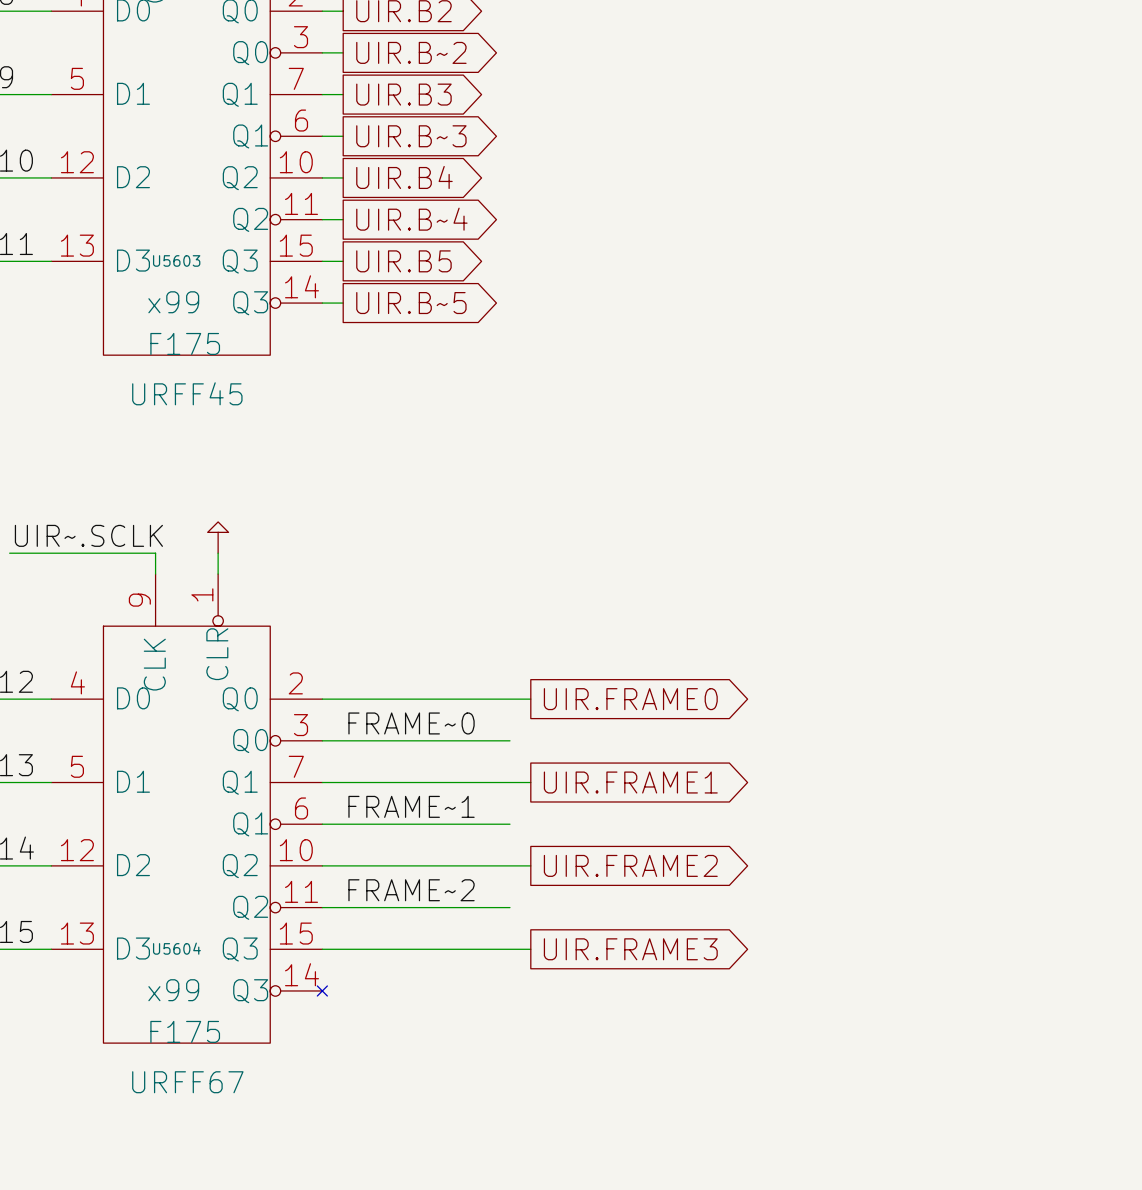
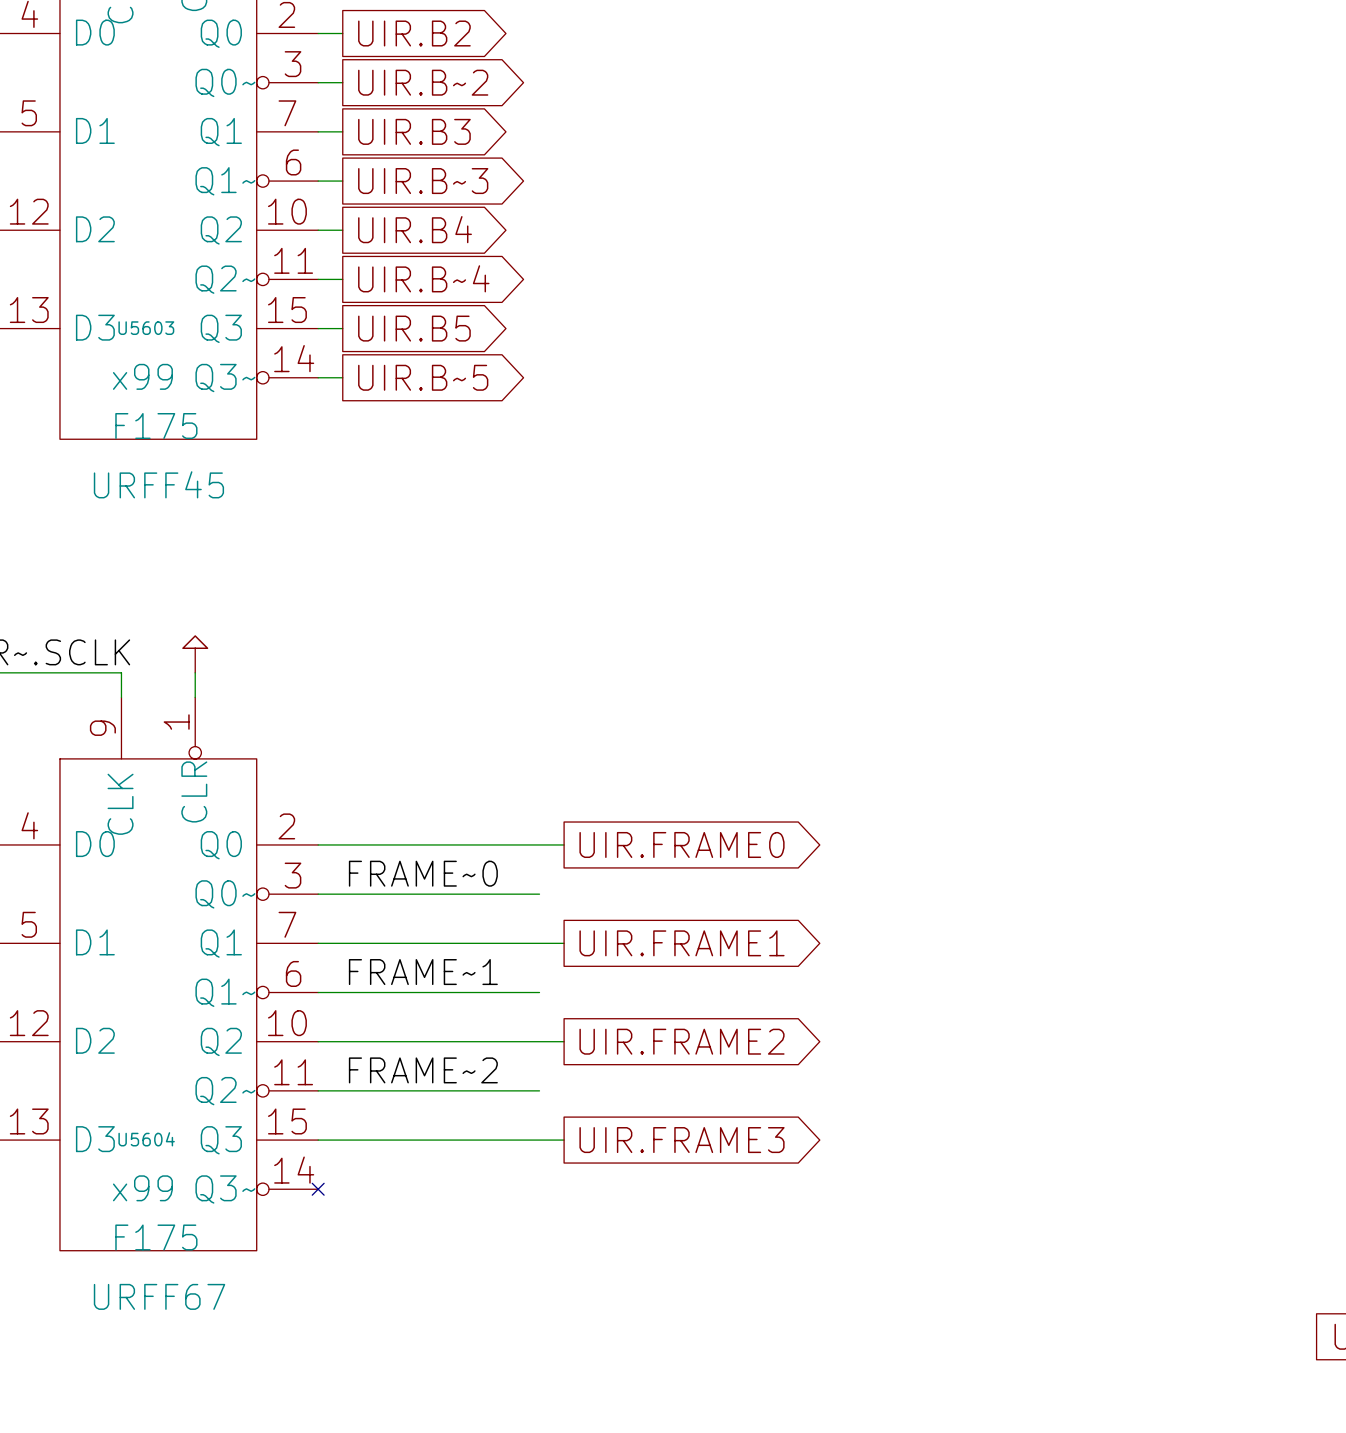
U5603 pin name: Q0 (250, 53) -> Q0~ (225, 82)
U5603 pin name: Q1 (250, 136) -> Q1~ (225, 181)
U5603 pin name: Q2 (250, 219) -> Q2~ (225, 279)
U5603 pin name: Q3 (250, 303) -> Q3~ (225, 378)
U5604 pin name: Q0 (250, 741) -> Q0~ (225, 894)
U5604 pin name: Q1 (250, 824) -> Q1~ (225, 992)
U5604 pin name: Q2 (250, 907) -> Q2~ (225, 1091)
U5604 pin name: Q3 (250, 991) -> Q3~ (225, 1189)

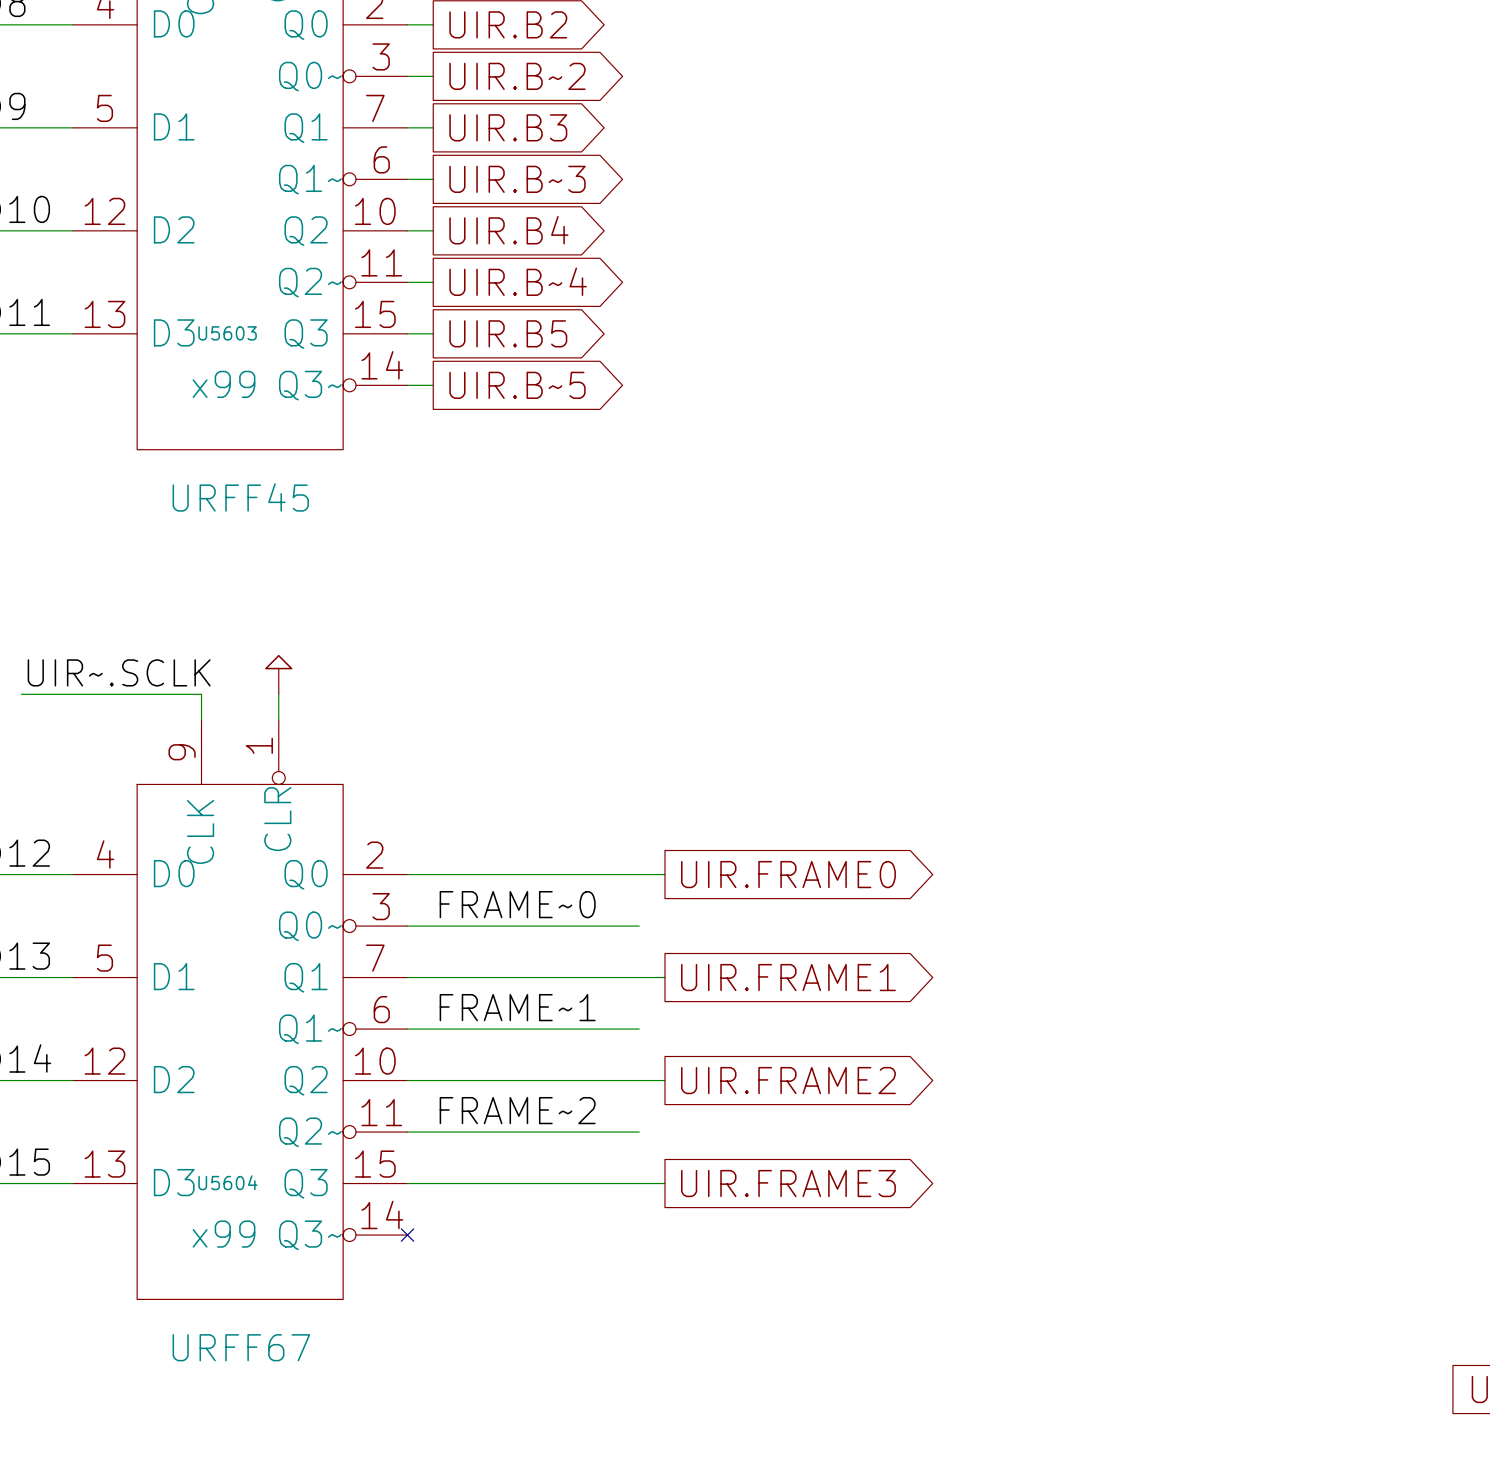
U5603 value: F175 (156, 426) -> none
U5604 value: F175 (156, 1237) -> none

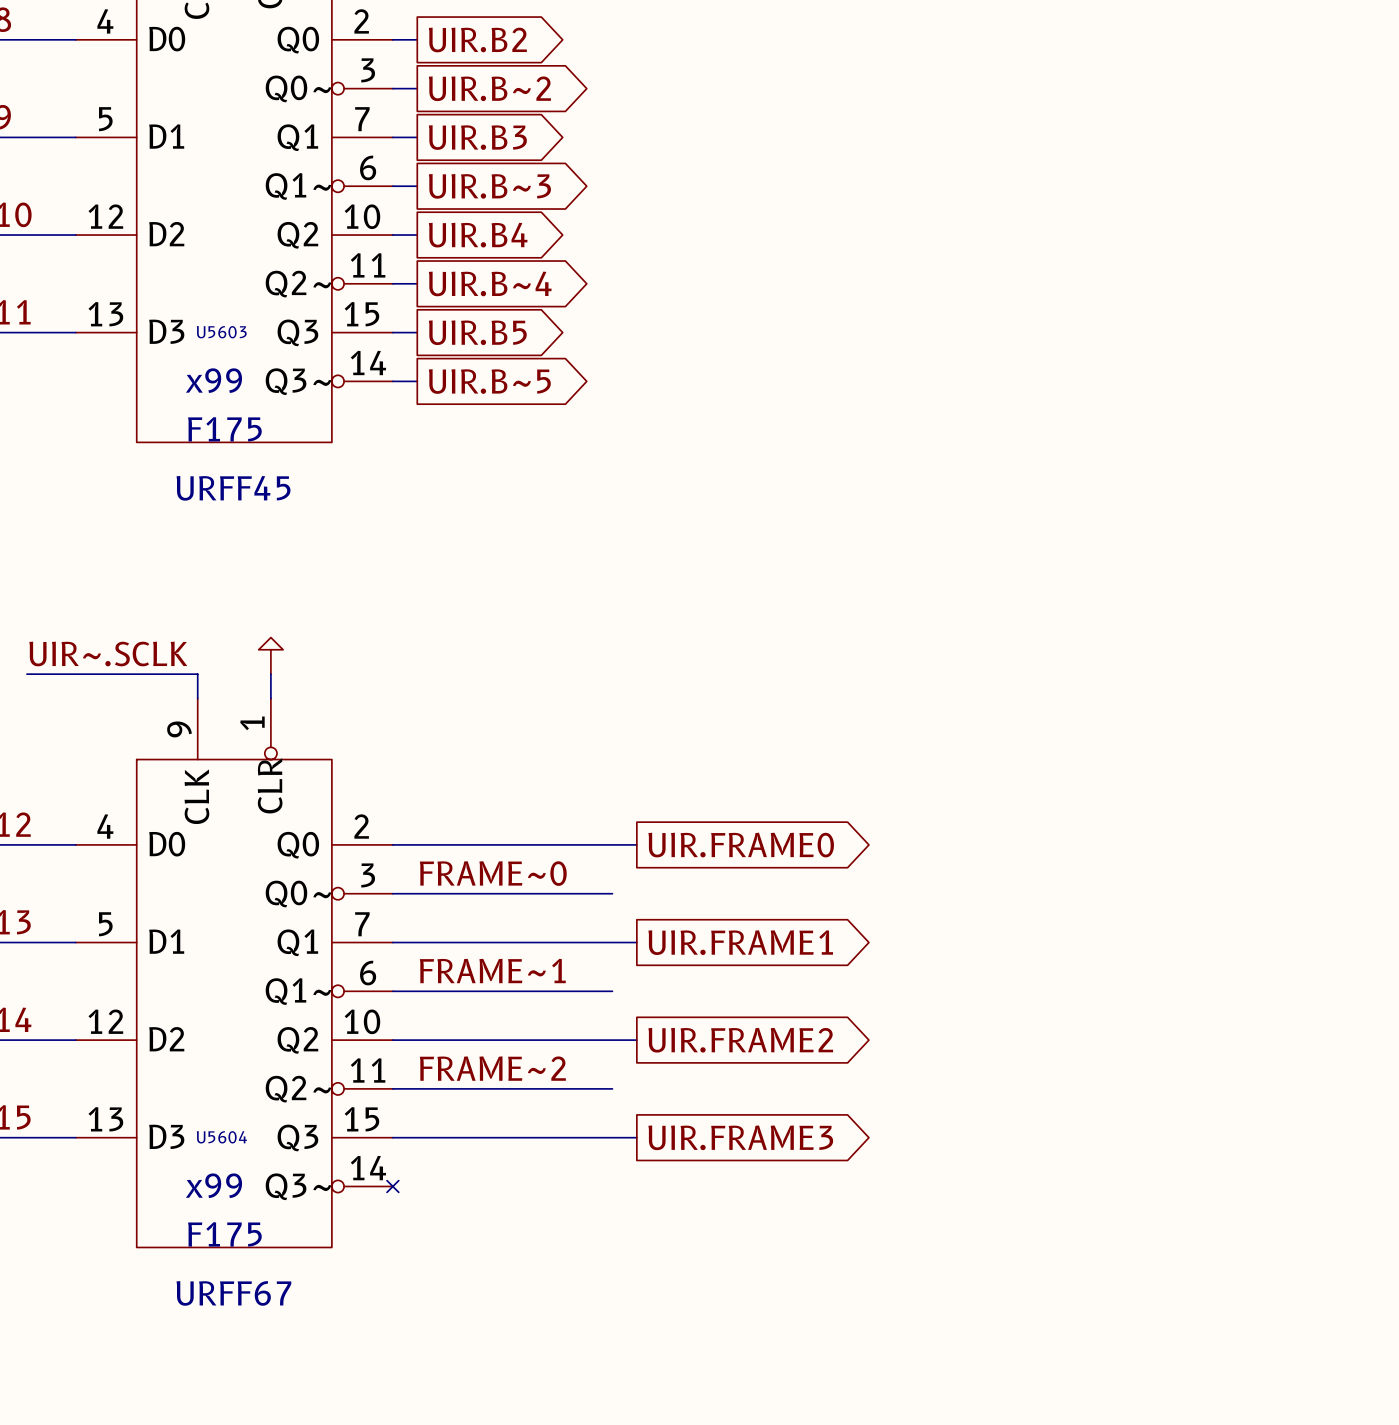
U5603 value: none -> F175 (224, 429)
U5604 value: none -> F175 (224, 1234)

